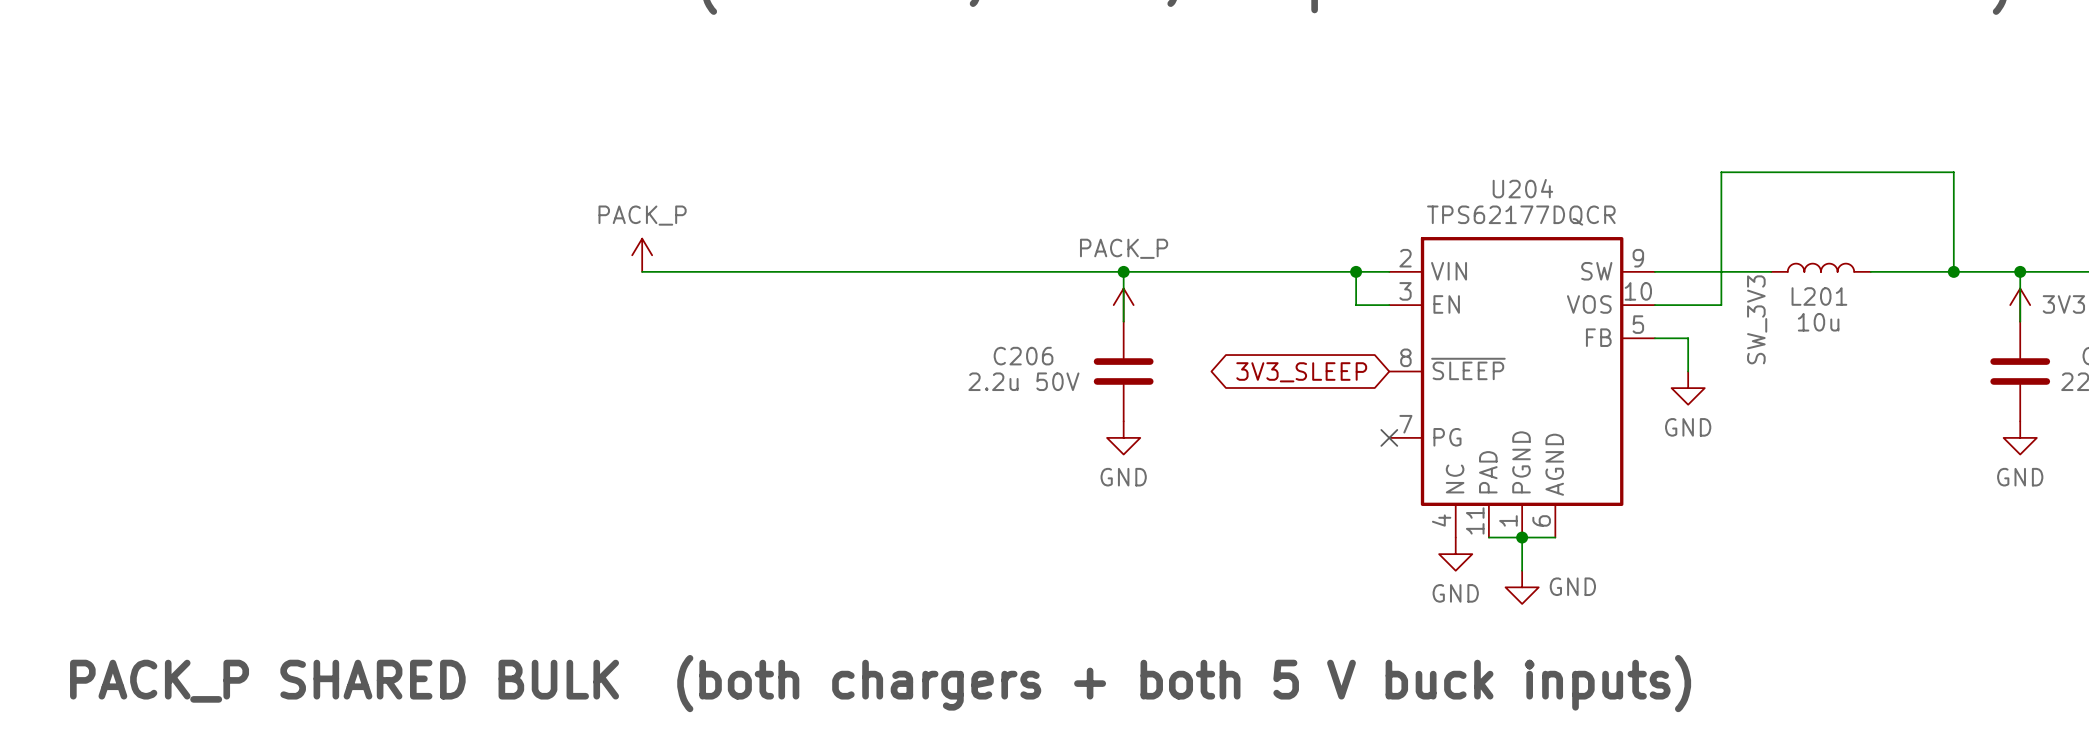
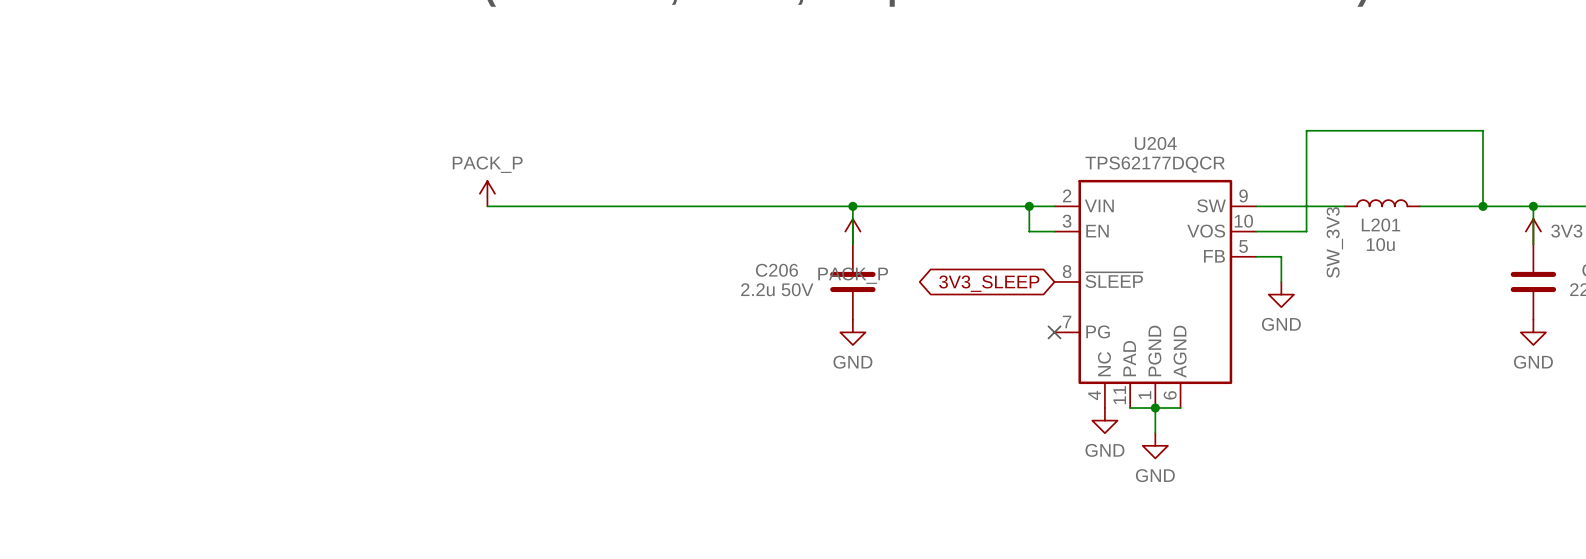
power symbol text position: PACK_P (1124, 248) -> PACK_P (853, 275)
power symbol text position: GND (1572, 586) -> GND (1155, 475)
text: PACK_P SHARED BULK (both chargers + both 5 V buck inputs) (880, 683) -> none

